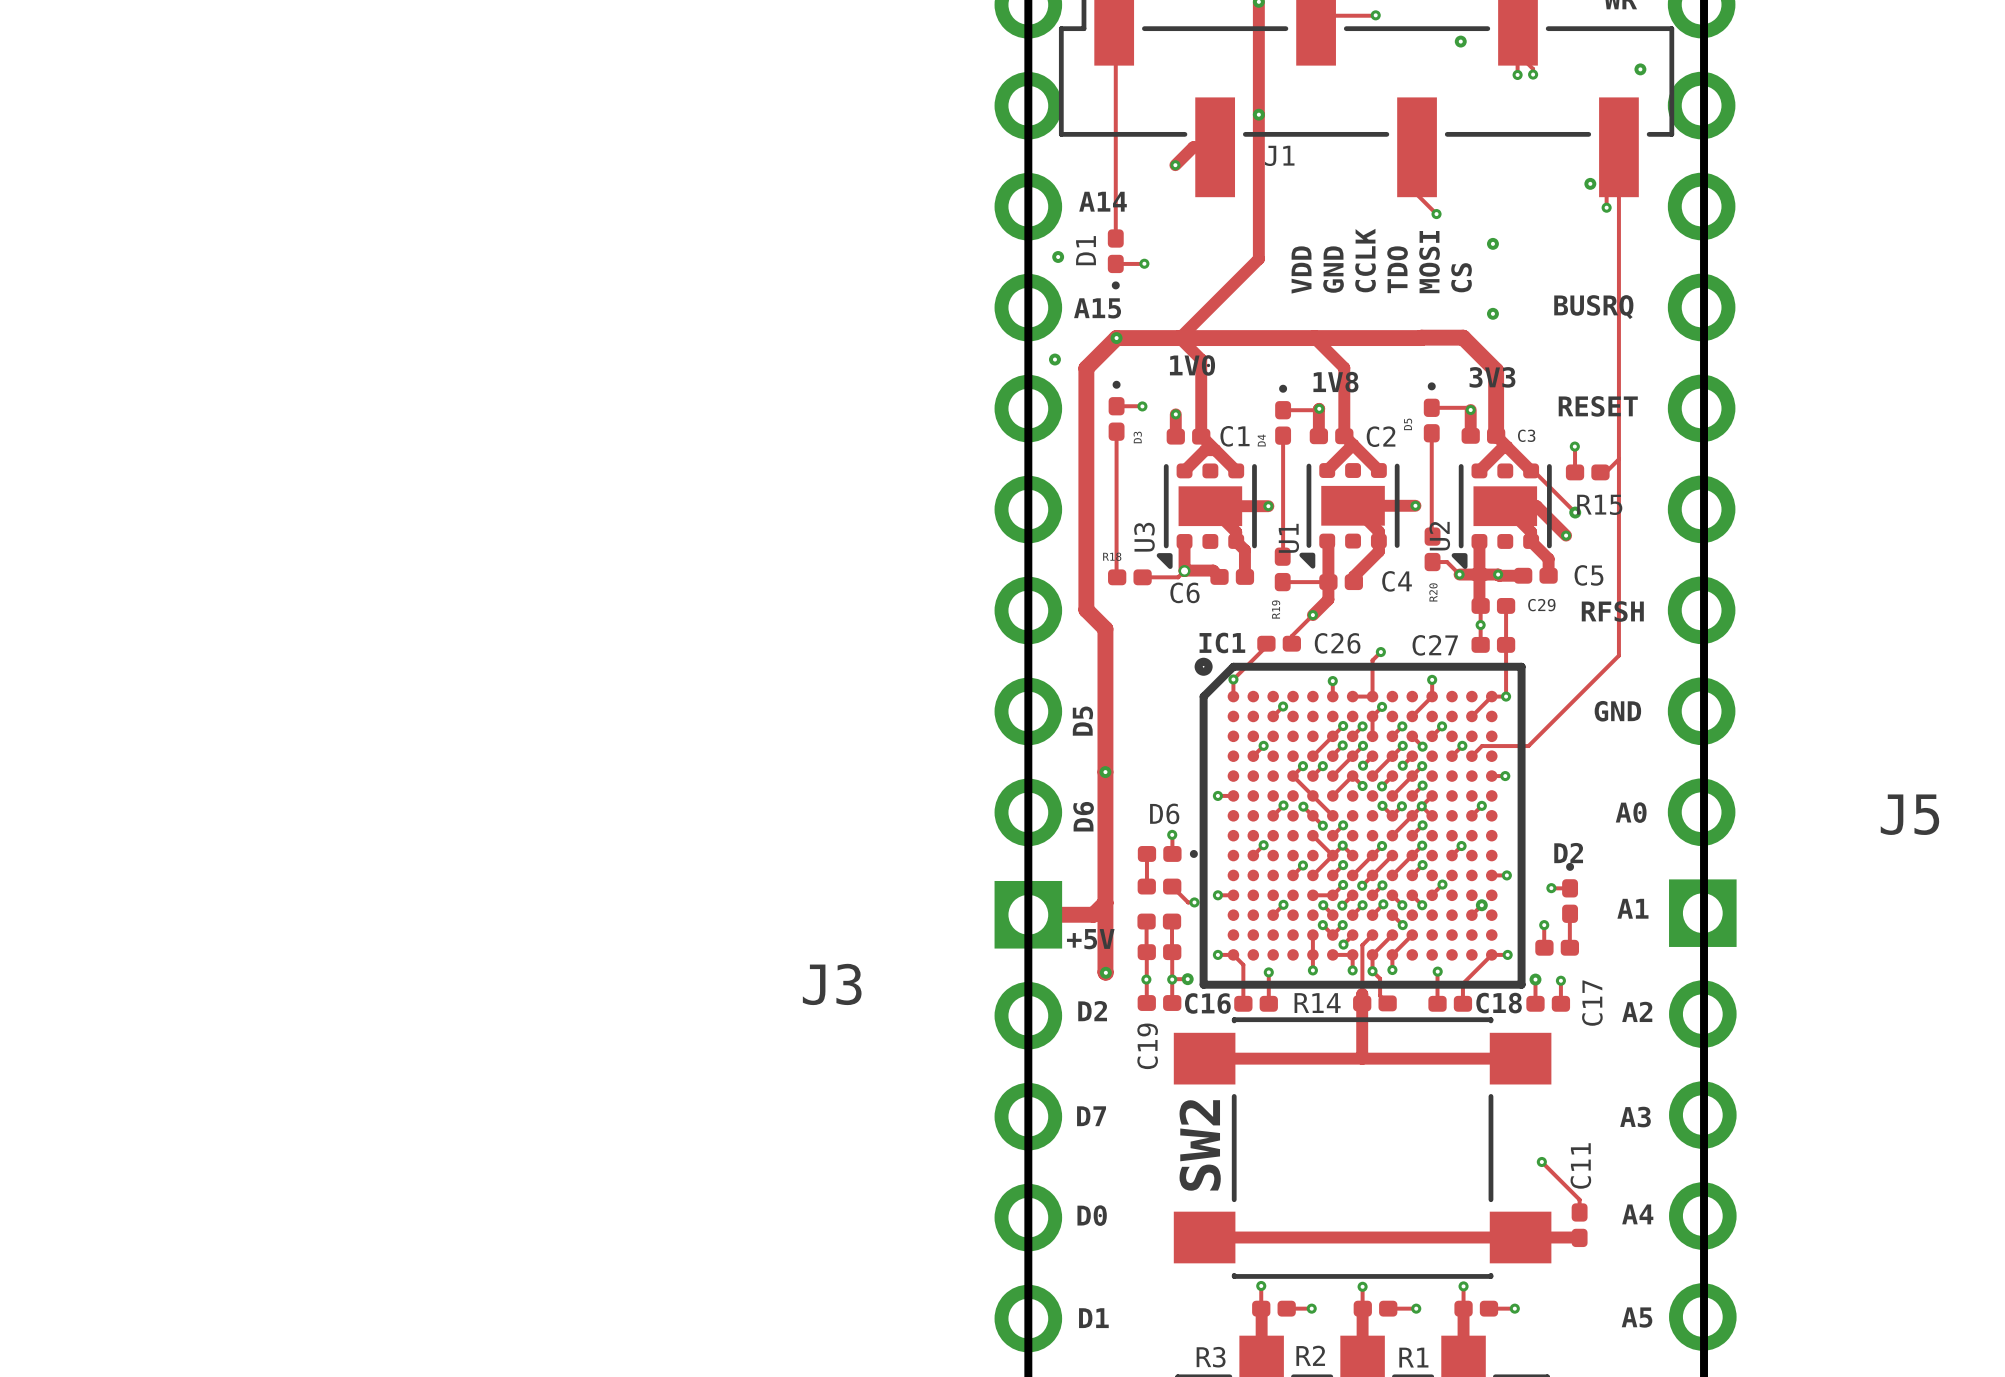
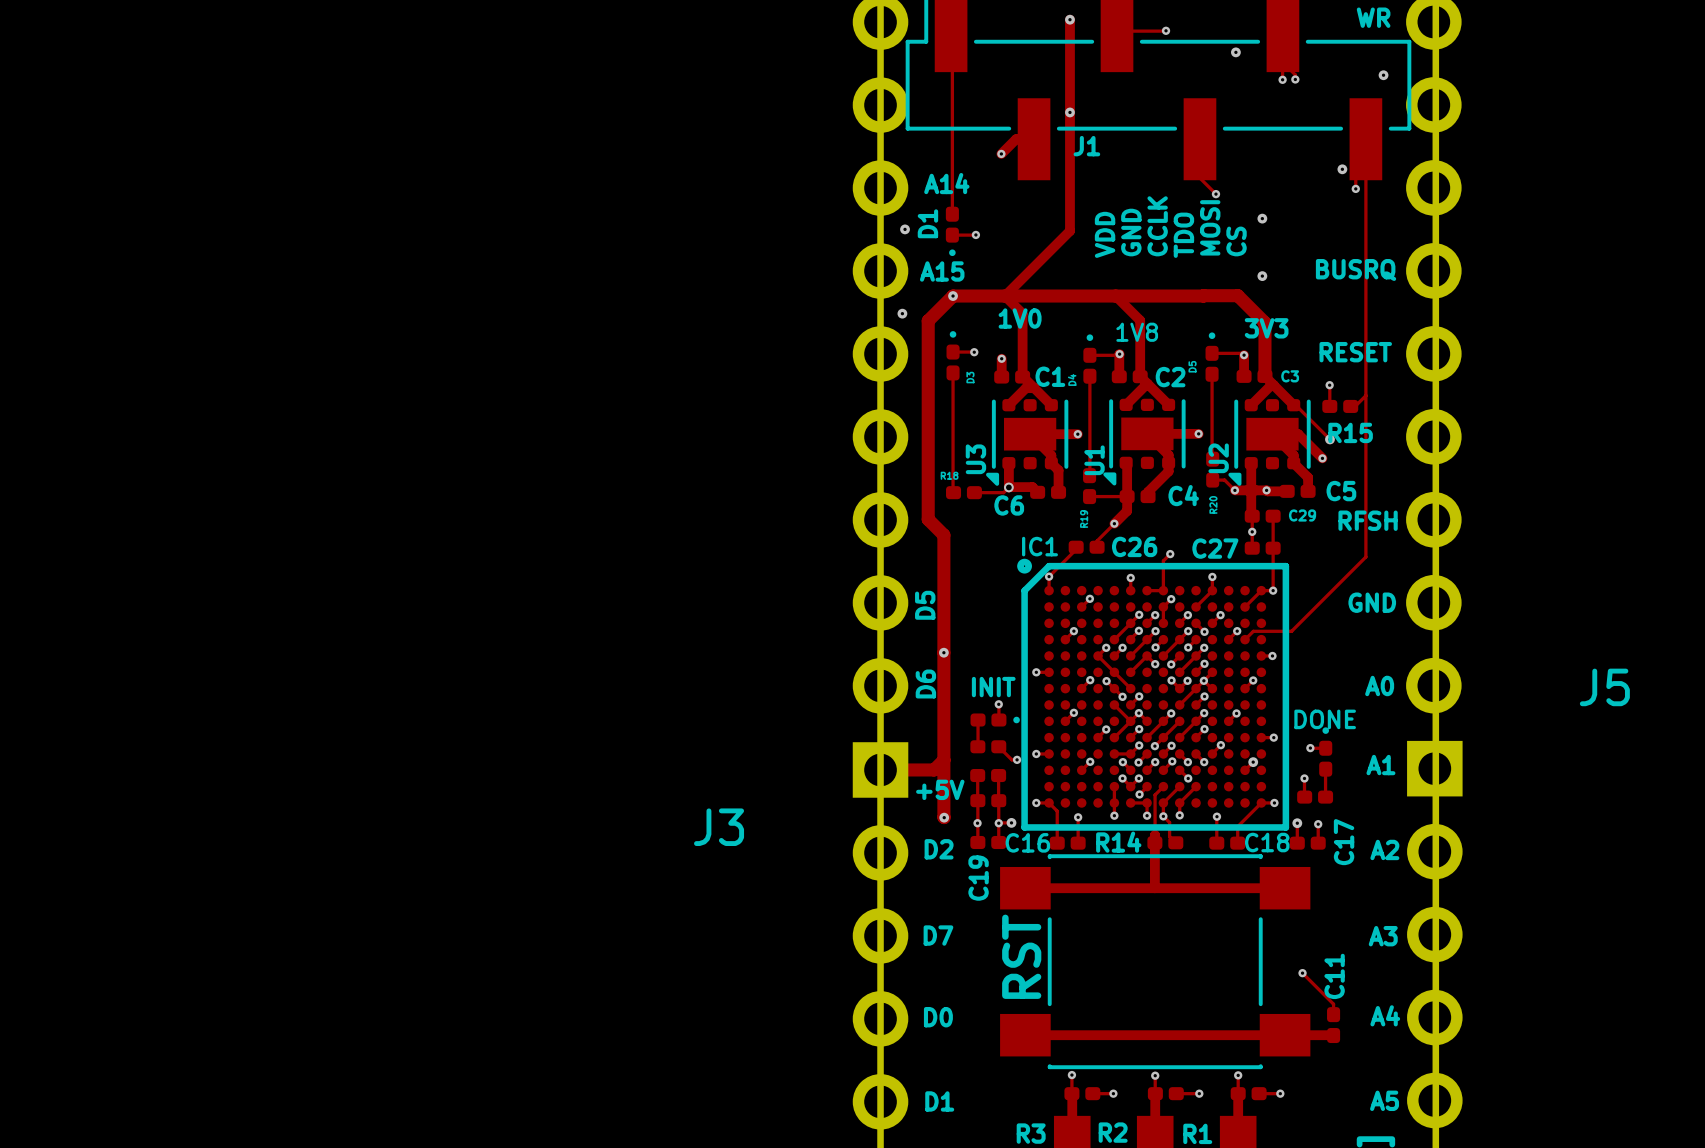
D6 name: D6 (1164, 813) -> INIT (993, 687)
D2 name: D2 (1568, 853) -> DONE (1325, 719)
SW2 name: SW2 (1200, 1145) -> RST (1021, 956)

